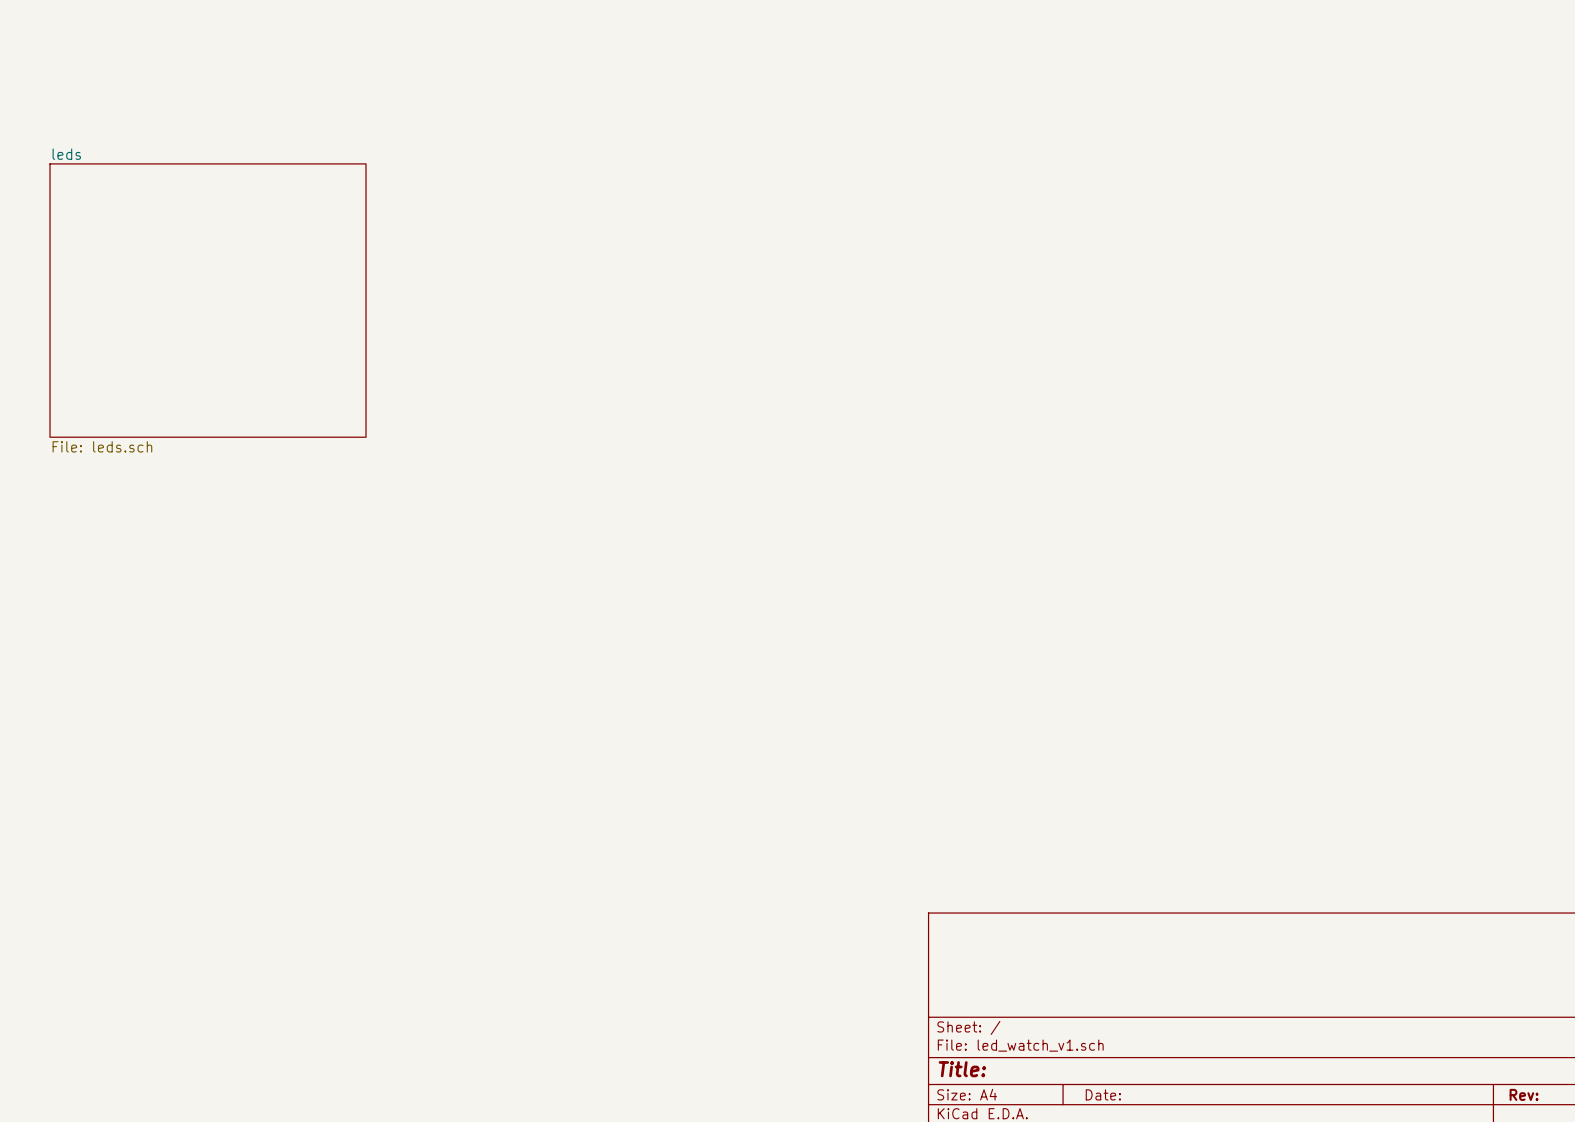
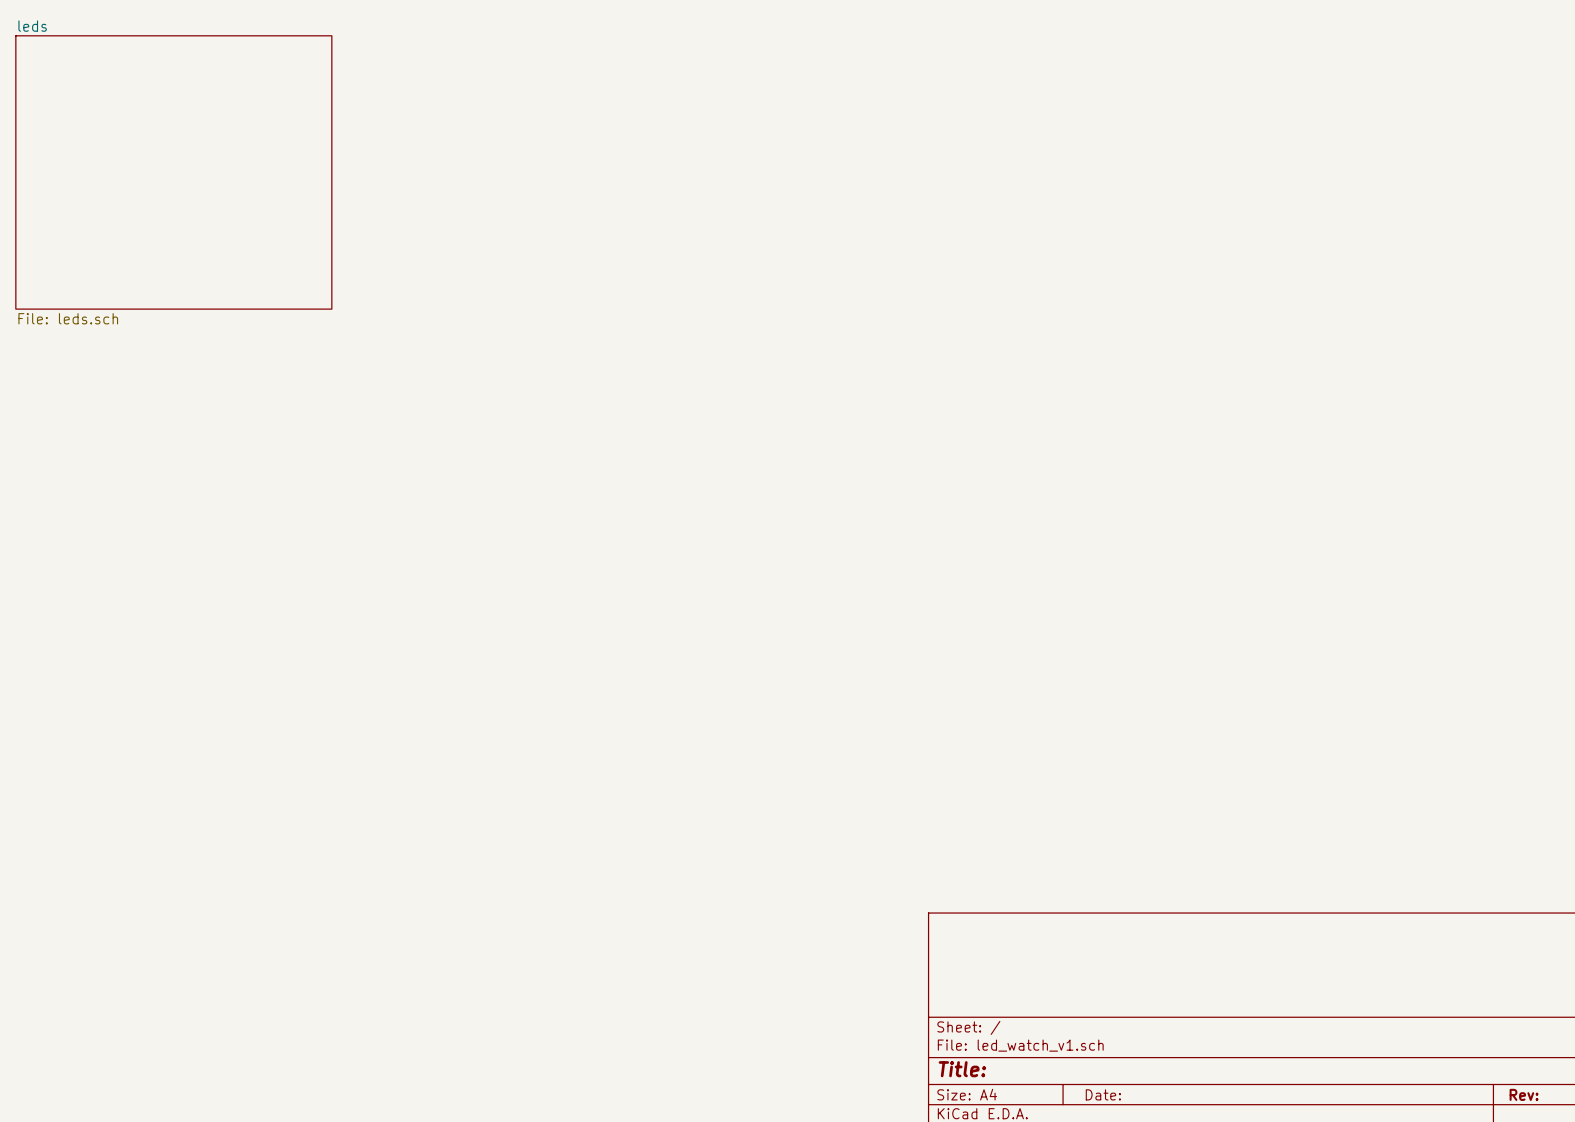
sheet leds position: (208, 300) -> (173, 172)

